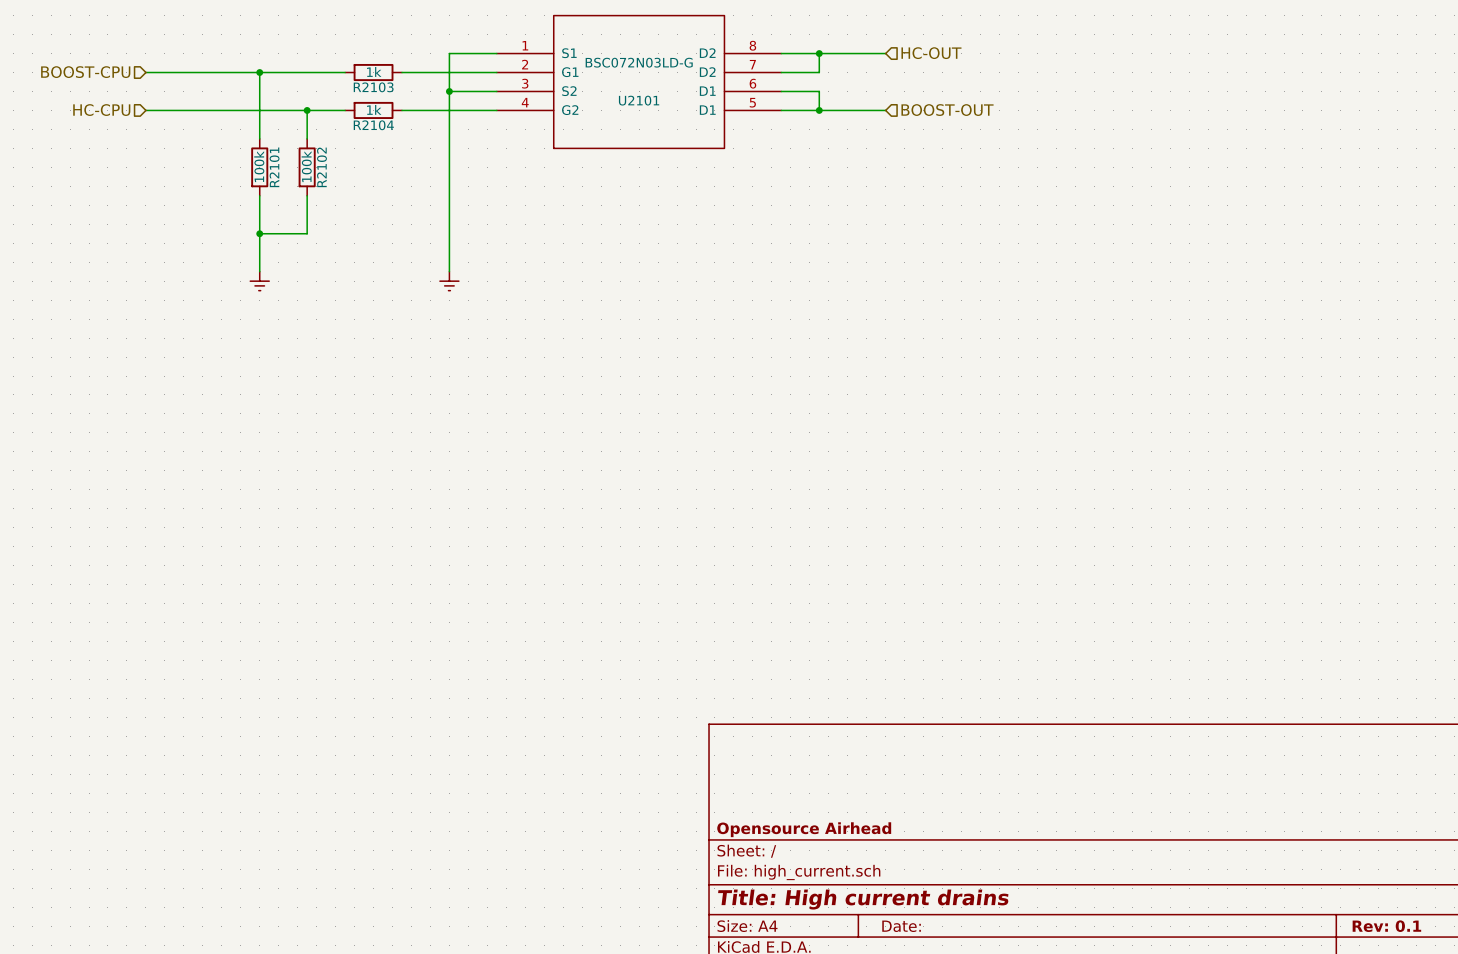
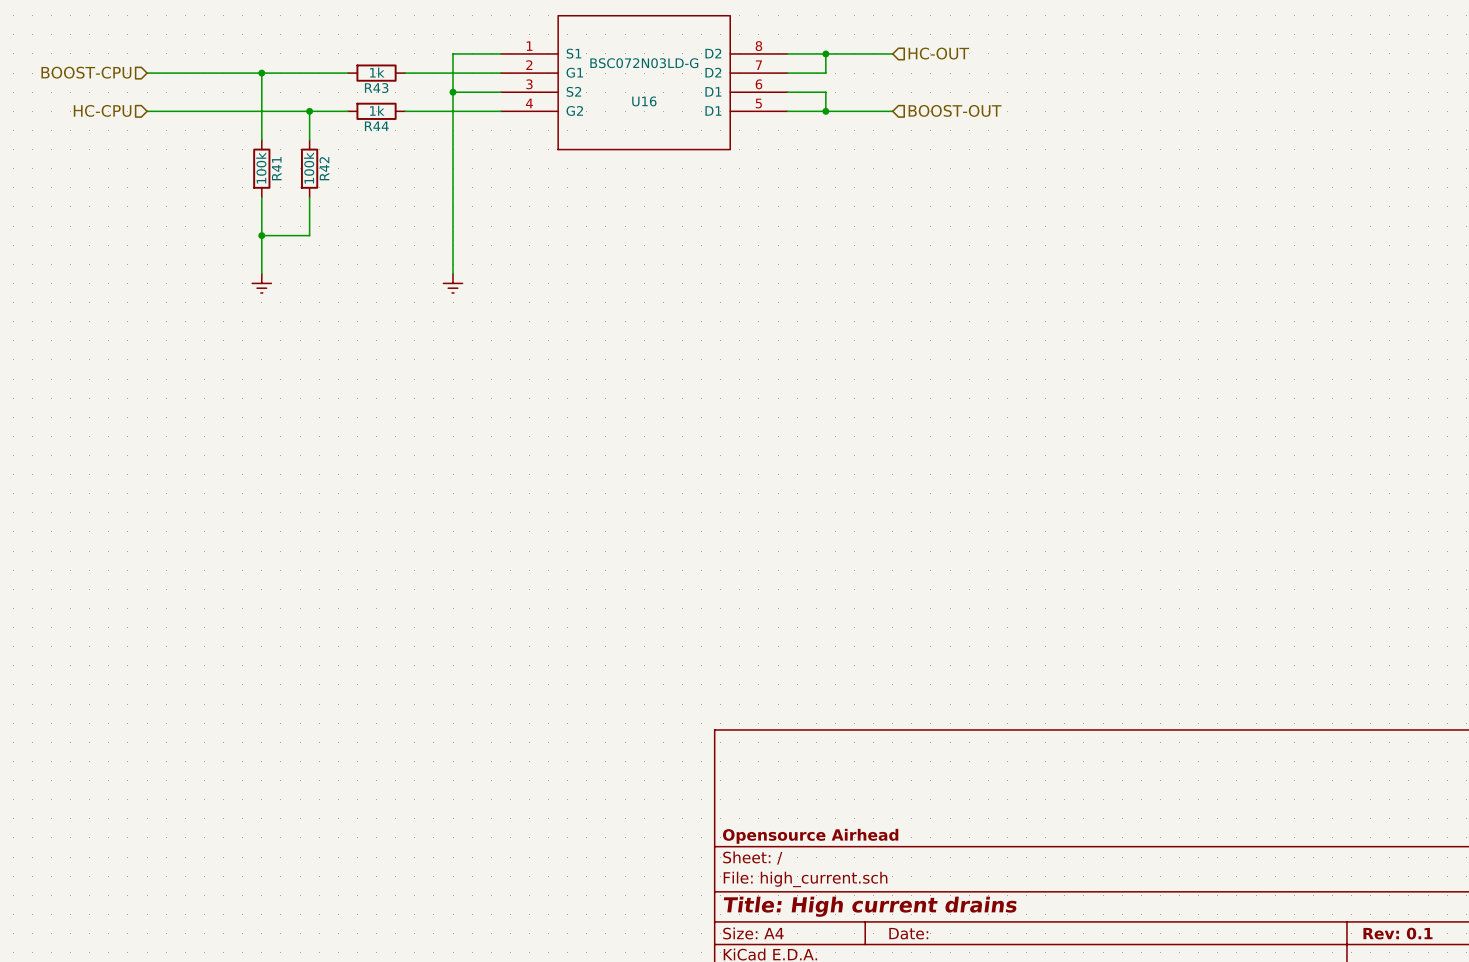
R2103 name: R2103 (373, 87) -> R43 (376, 88)
U2101 name: U2101 (639, 100) -> U16 (644, 101)
R2104 name: R2104 (373, 125) -> R44 (376, 126)
R2101 name: R2101 (274, 167) -> R41 (276, 168)
R2102 name: R2102 (321, 167) -> R42 (324, 168)

